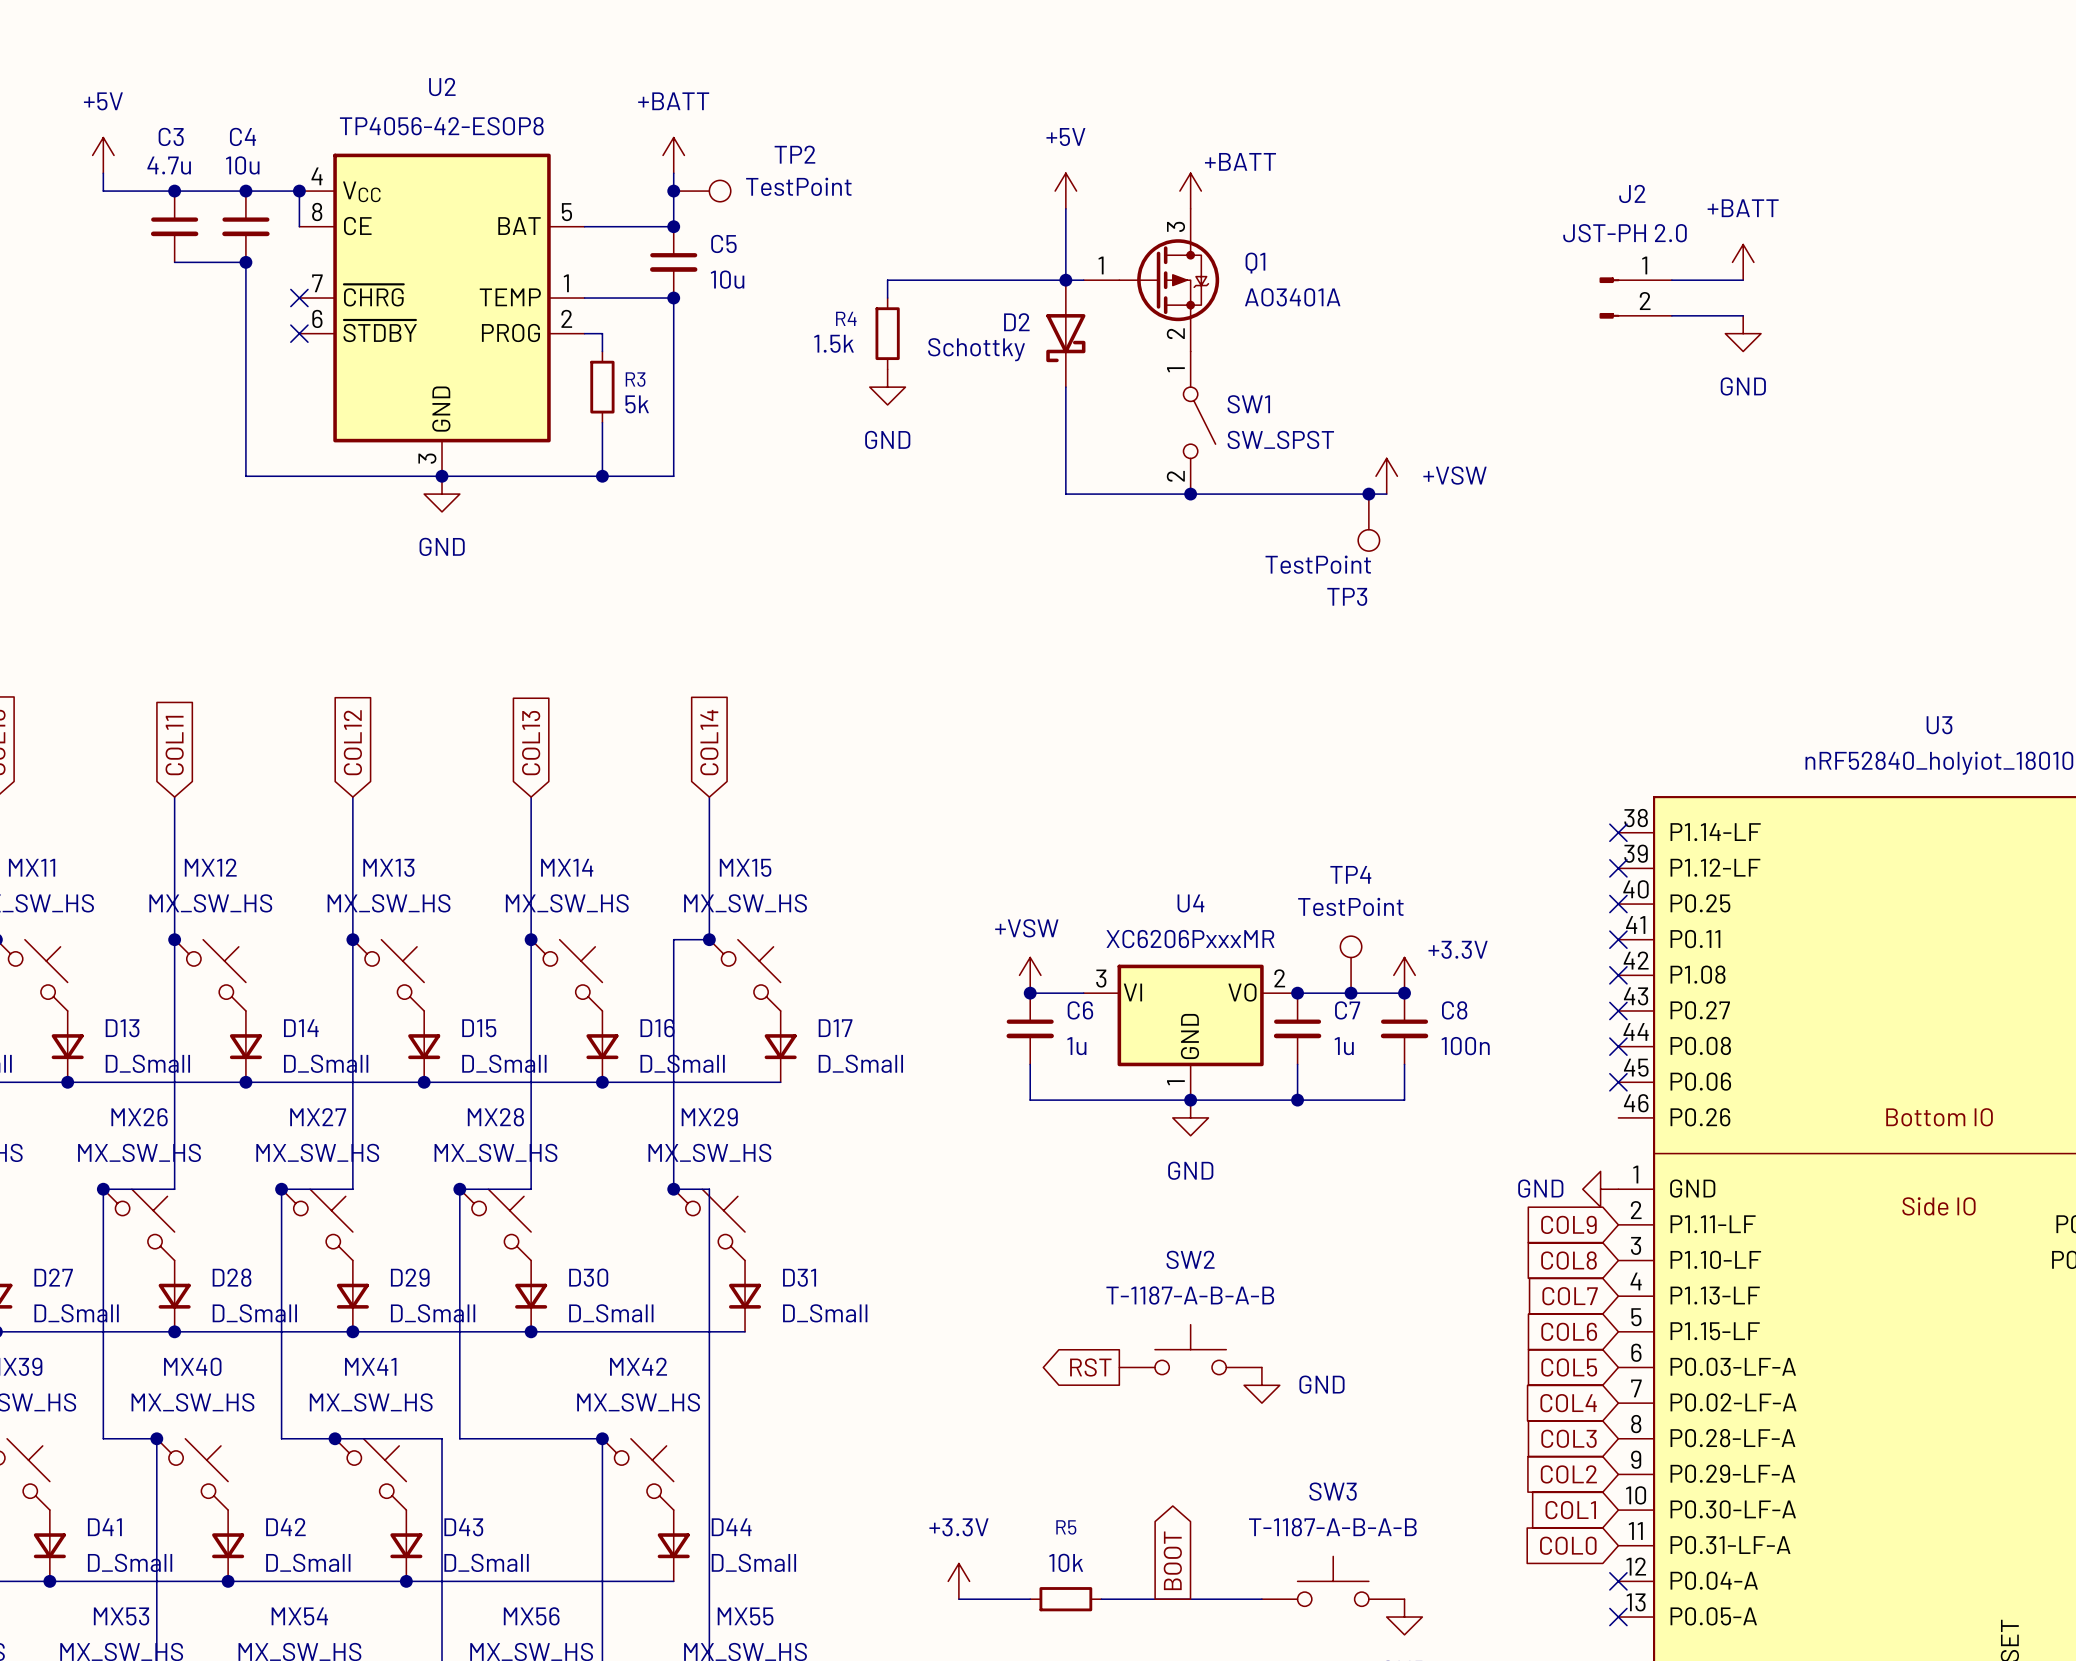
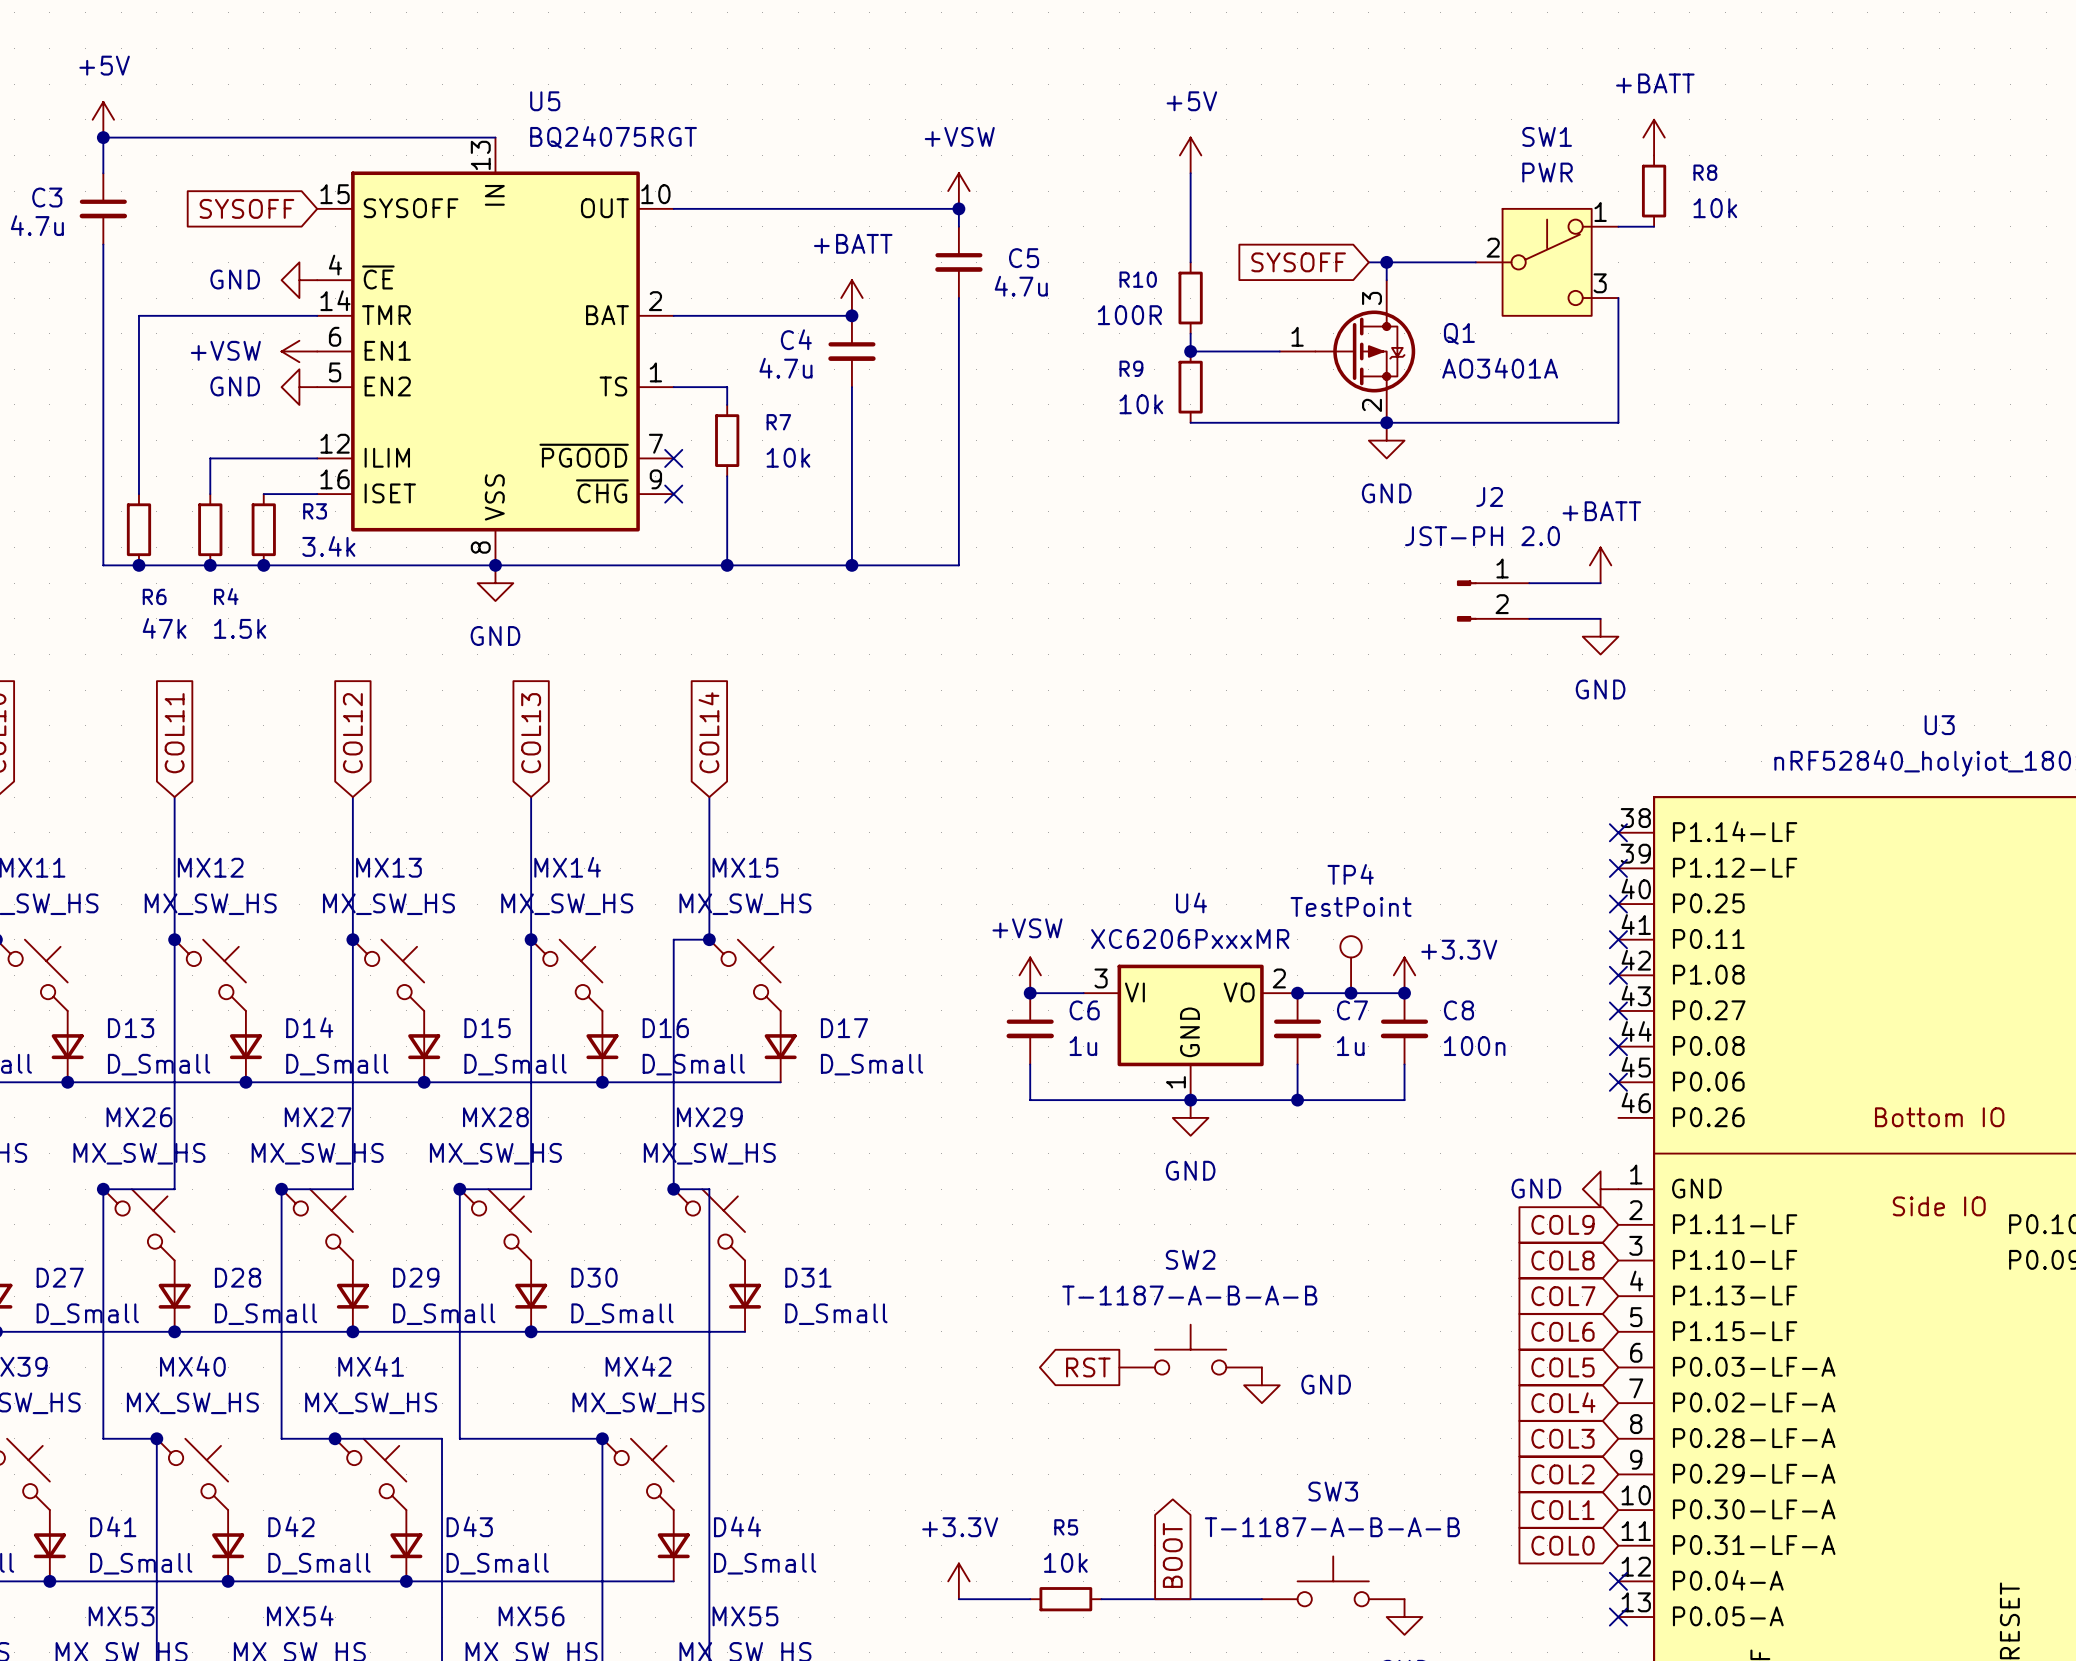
C3 name position: C3 (171, 136) -> C3 (47, 197)
C4 name position: C4 (242, 136) -> C4 (796, 339)
junction: none -> (103, 137)
power symbol position: +5V (103, 155) -> +5V (103, 119)
power symbol: +BATT (673, 155) -> none
C3 value position: 4.7u (169, 165) -> 4.7u (37, 225)
C4 value: 10u (242, 165) -> 4.7u (785, 368)
wire: (103, 173) (103, 191) (299, 191) (299, 226) -> (103, 173) (103, 137) (495, 137)
wire: (673, 173) (673, 226) (584, 226) -> none
junction: (174, 191) -> none
junction: (245, 191) -> none
junction: (299, 191) -> none
junction: (673, 191) -> none
TP2: TestPoint (702, 191) -> none
power symbol: none -> +VSW (958, 191)
power symbol position: +5V (1065, 191) -> +5V (1190, 155)
power symbol: +BATT (1190, 191) -> none
R8: none -> 10k (1654, 191)
global label: none -> SYSOFF (246, 208)
wire: none -> (673, 208) (958, 208) (958, 226)
junction: none -> (958, 208)
wire: (1065, 208) (1065, 280) -> none
C3 position: (174, 226) -> (103, 208)
C4 position: (245, 226) -> (851, 351)
junction: (673, 226) -> none
wire: none -> (1618, 226) (1654, 226)
C5 name position: C5 (723, 243) -> C5 (1024, 258)
wire: none -> (103, 244) (103, 565) (958, 565) (958, 298)
wire: (174, 262) (245, 262) (245, 476) (673, 476) (673, 298) (584, 298) -> none
junction: (245, 262) -> none
C5 position: (673, 262) -> (958, 262)
global label: none -> SYSOFF (1298, 262)
wire: none -> (1368, 262) (1475, 262)
wire: none -> (1386, 262) (1386, 280)
junction: none -> (1386, 262)
power symbol position: +BATT (1743, 262) -> +BATT (1654, 137)
C5 value: 10u (727, 279) -> 4.7u (1021, 286)
power symbol: none -> GND (299, 280)
junction: (1065, 280) -> none
wire: (1083, 280) (887, 280) (887, 298) -> none
Q1 position: (1151, 280) -> (1347, 351)
wire: (1671, 280) (1743, 280) -> (1529, 583) (1600, 583)
no-connect mark: (299, 298) -> none
junction: (673, 298) -> none
power symbol: none -> +BATT (851, 298)
R10: none -> 100R (1190, 298)
wire: none -> (1618, 298) (1618, 422) (1190, 422)
J2 position: (1635, 298) -> (1493, 601)
U2: TP4056-42-ESOP8 (442, 314) -> none
wire: none -> (317, 315) (138, 315) (138, 494)
wire: none -> (673, 315) (851, 315)
junction: none -> (851, 315)
wire: (1671, 315) (1743, 315) -> (1529, 618) (1600, 618)
R4 name position: R4 (846, 318) -> R4 (226, 596)
no-connect mark: (299, 333) -> none
R4 position: (887, 333) -> (210, 529)
D2: Schottky (1065, 333) -> none
wire: none -> (1190, 333) (1190, 351) (1279, 351)
power symbol: GND (1743, 333) -> none
R4 value position: 1.5k (834, 343) -> 1.5k (240, 628)
power symbol: none -> +VSW (299, 351)
U5: none -> BQ24075RGT (495, 351)
SW1 symbol: [1183, 351, 1216, 495] -> [1475, 208, 1619, 316]
junction: none -> (1190, 351)
R3 name position: R3 (635, 379) -> R3 (315, 511)
power symbol: none -> GND (299, 387)
R3 position: (602, 387) -> (263, 529)
wire: none -> (673, 387) (727, 387) (727, 404)
wire: none -> (851, 387) (851, 565)
power symbol: GND (887, 387) -> none
wire: (1065, 387) (1065, 494) (1386, 494) -> none
R9: none -> 10k (1190, 387)
R3 value: 5k (637, 404) -> 3.4k (328, 546)
SW1 name position: SW1 (1248, 404) -> SW1 (1547, 136)
SW1 value: SW_SPST (1280, 439) -> PWR (1547, 172)
R7: none -> 10k (727, 440)
power symbol: none -> GND (1386, 440)
wire: none -> (317, 458) (210, 458) (210, 494)
no-connect mark: none -> (673, 458)
junction: (442, 476) -> none
junction: (602, 476) -> none
wire: none -> (727, 476) (727, 565)
power symbol: +VSW (1386, 476) -> none
wire: none -> (263, 494) (317, 494)
power symbol: GND (442, 494) -> none
no-connect mark: none -> (673, 494)
junction: (1190, 494) -> none
junction position: (1368, 494) -> (1386, 422)
TP3: TestPoint (1368, 522) -> none
R6: none -> 47k (138, 529)
junction: none -> (138, 565)
junction: none -> (210, 565)
junction: none -> (263, 565)
junction: none -> (495, 565)
junction: none -> (727, 565)
junction: none -> (851, 565)
power symbol: none -> +BATT (1600, 565)
power symbol: none -> GND (495, 583)
power symbol: none -> GND (1600, 636)

